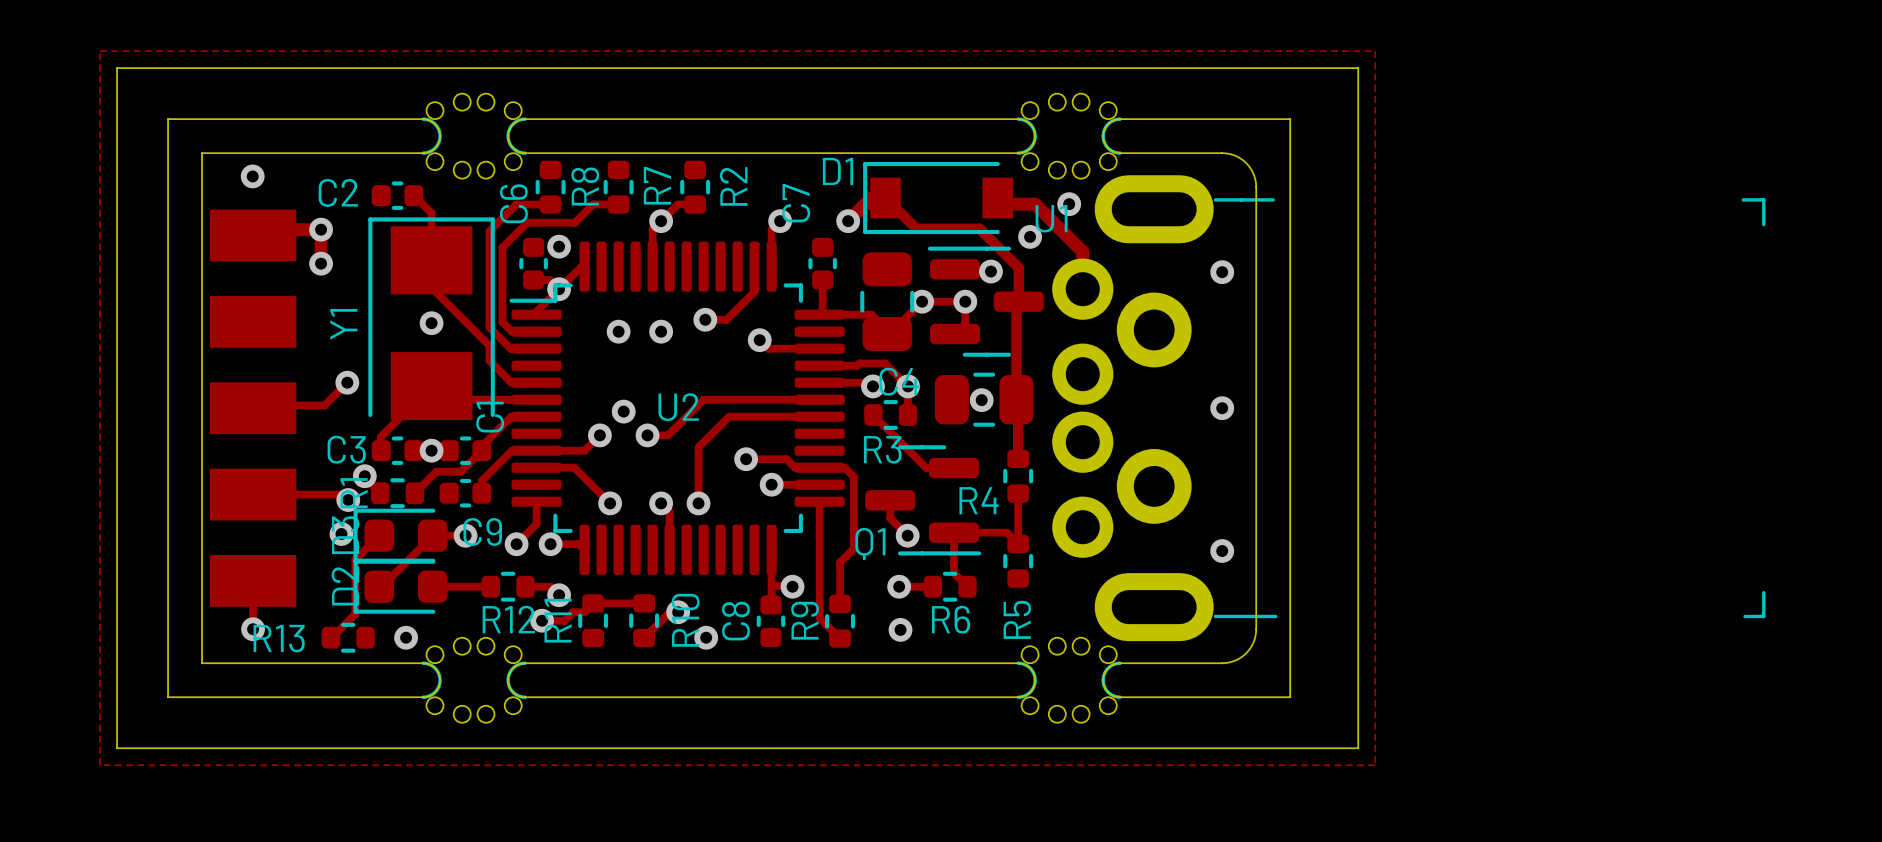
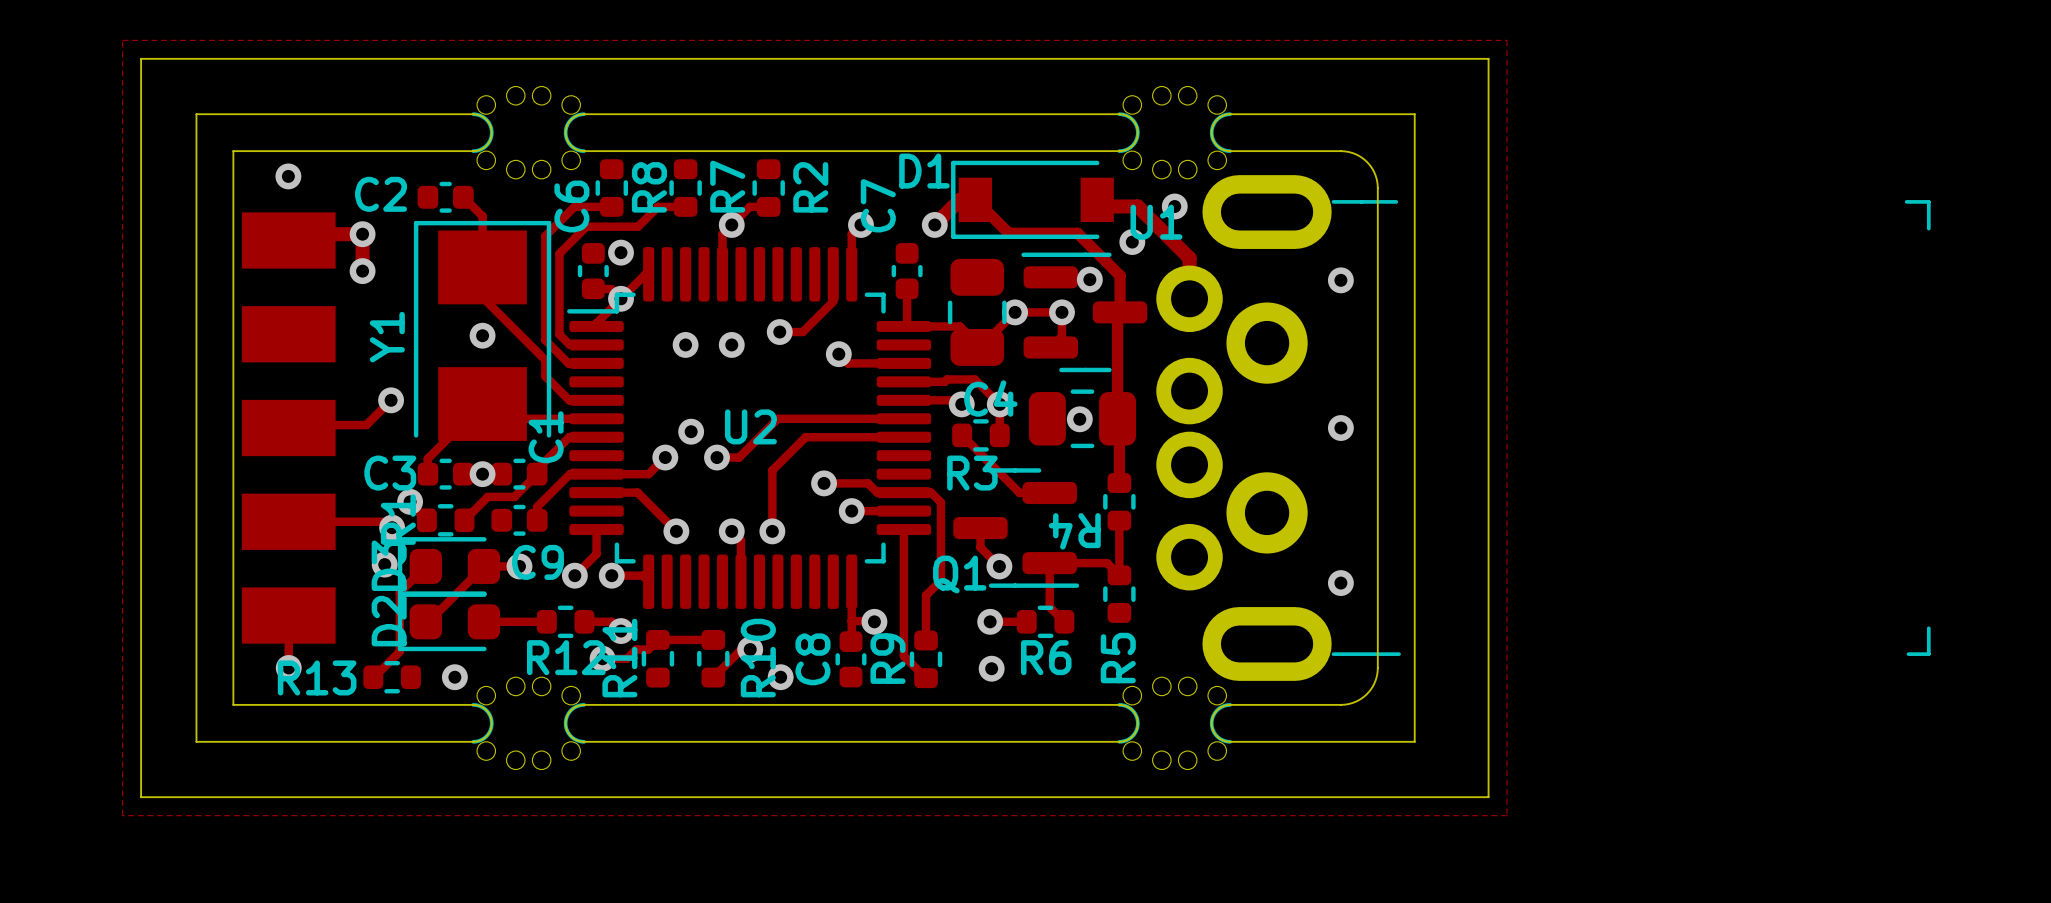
R4 name rotation: 0° (979, 500) -> 180° (1074, 531)

